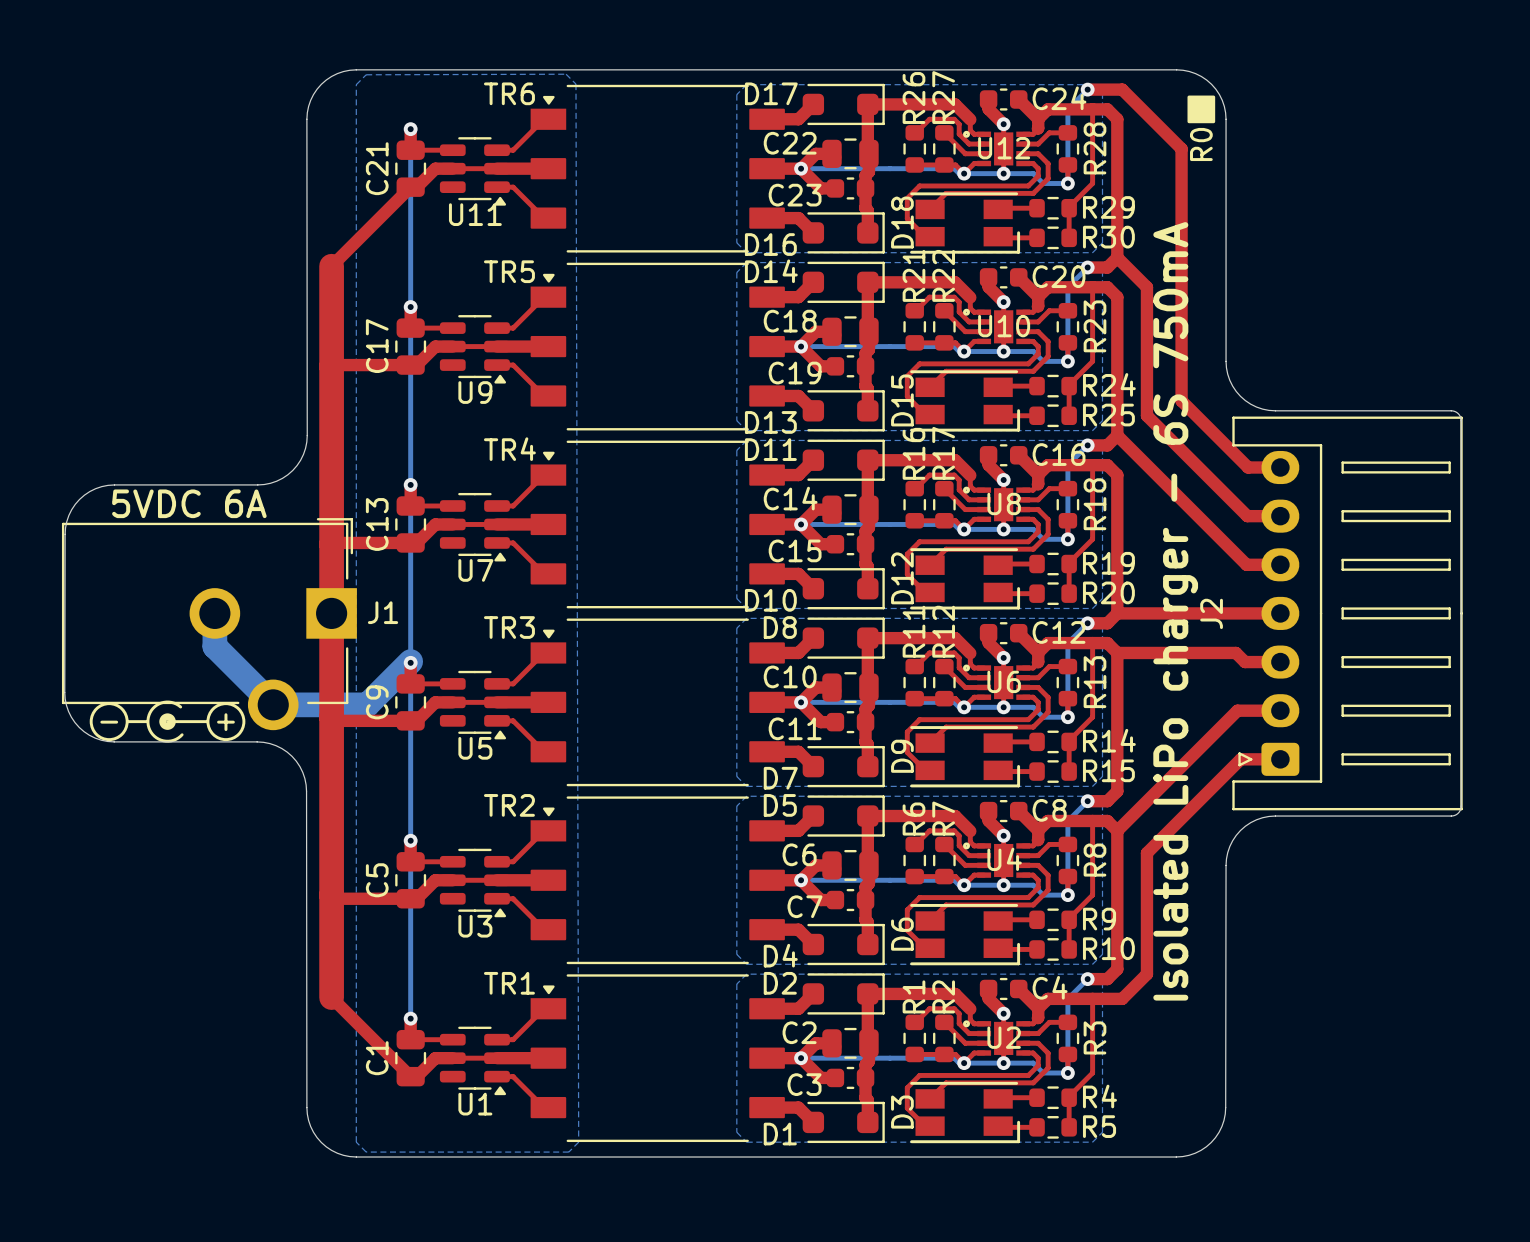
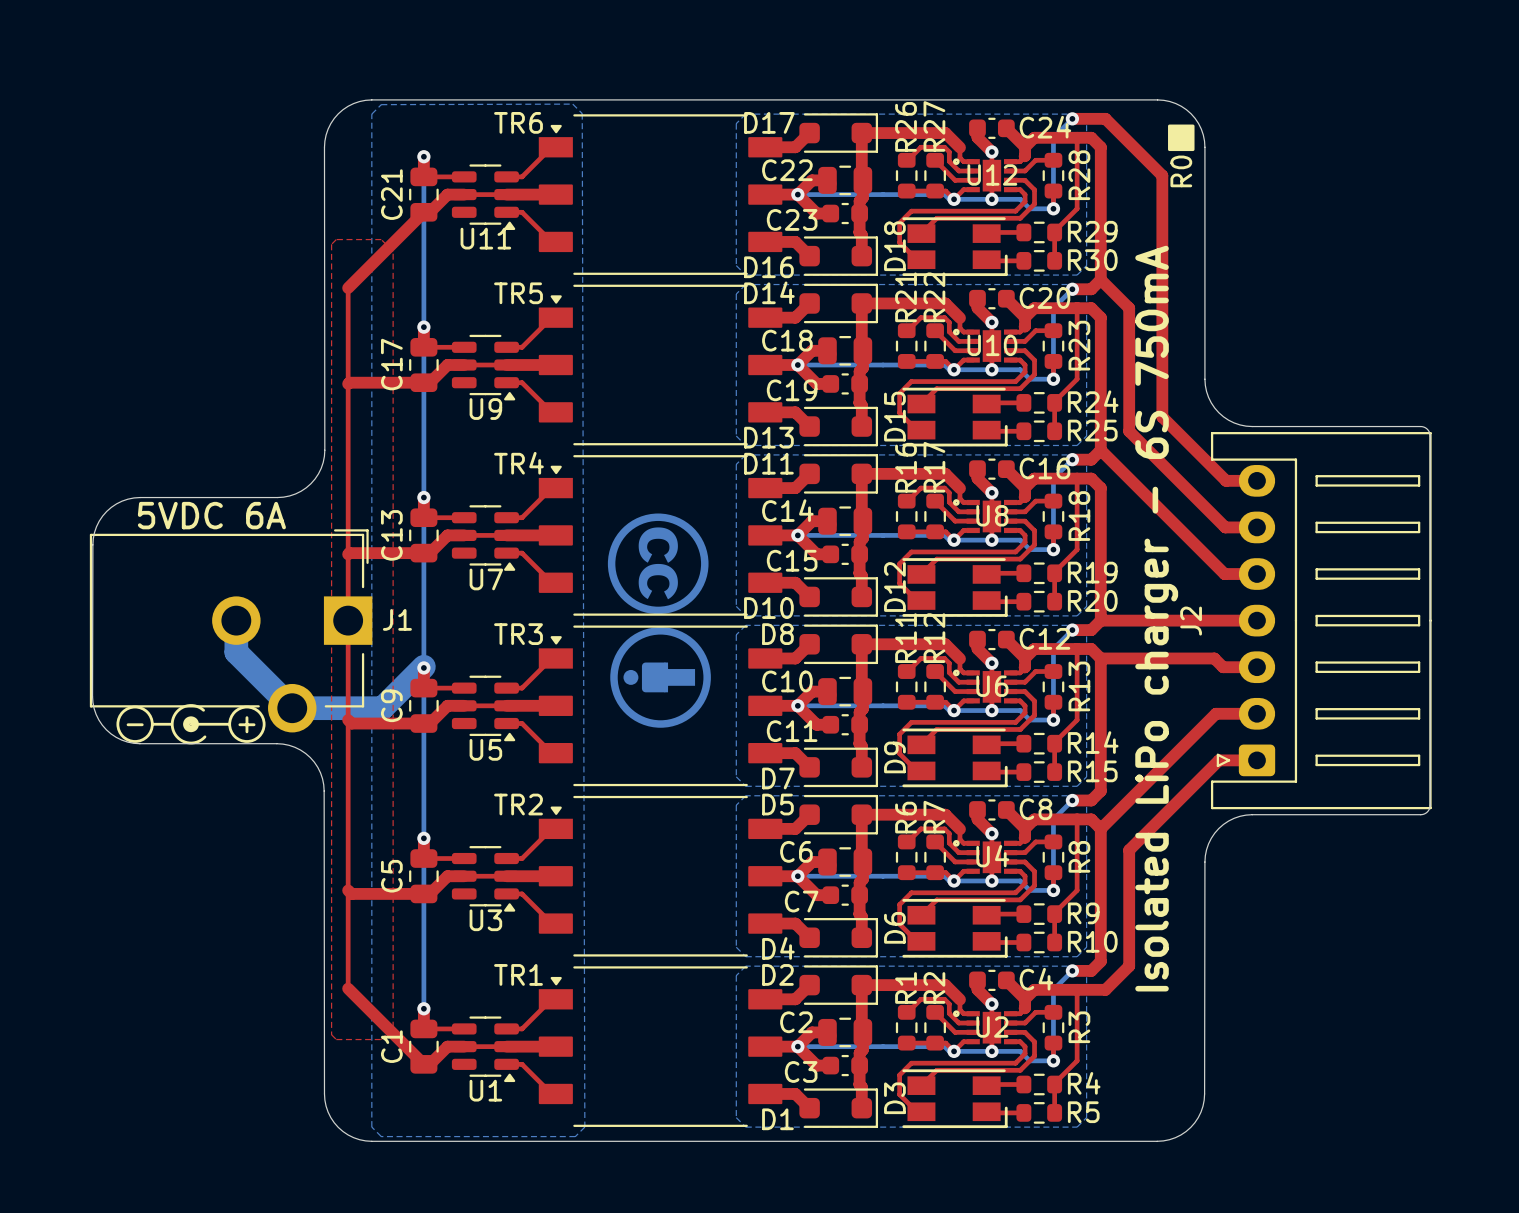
top zone outline: none -> (336, 239) (381, 239) (393, 251) (393, 1027) (381, 1039) (336, 1039) (331, 1034) (331, 244) (336, 239)
top track width: thick (331, 266) (331, 997) -> thin (348, 288) (348, 988)
drawing: none -> [607, 513, 711, 728]

